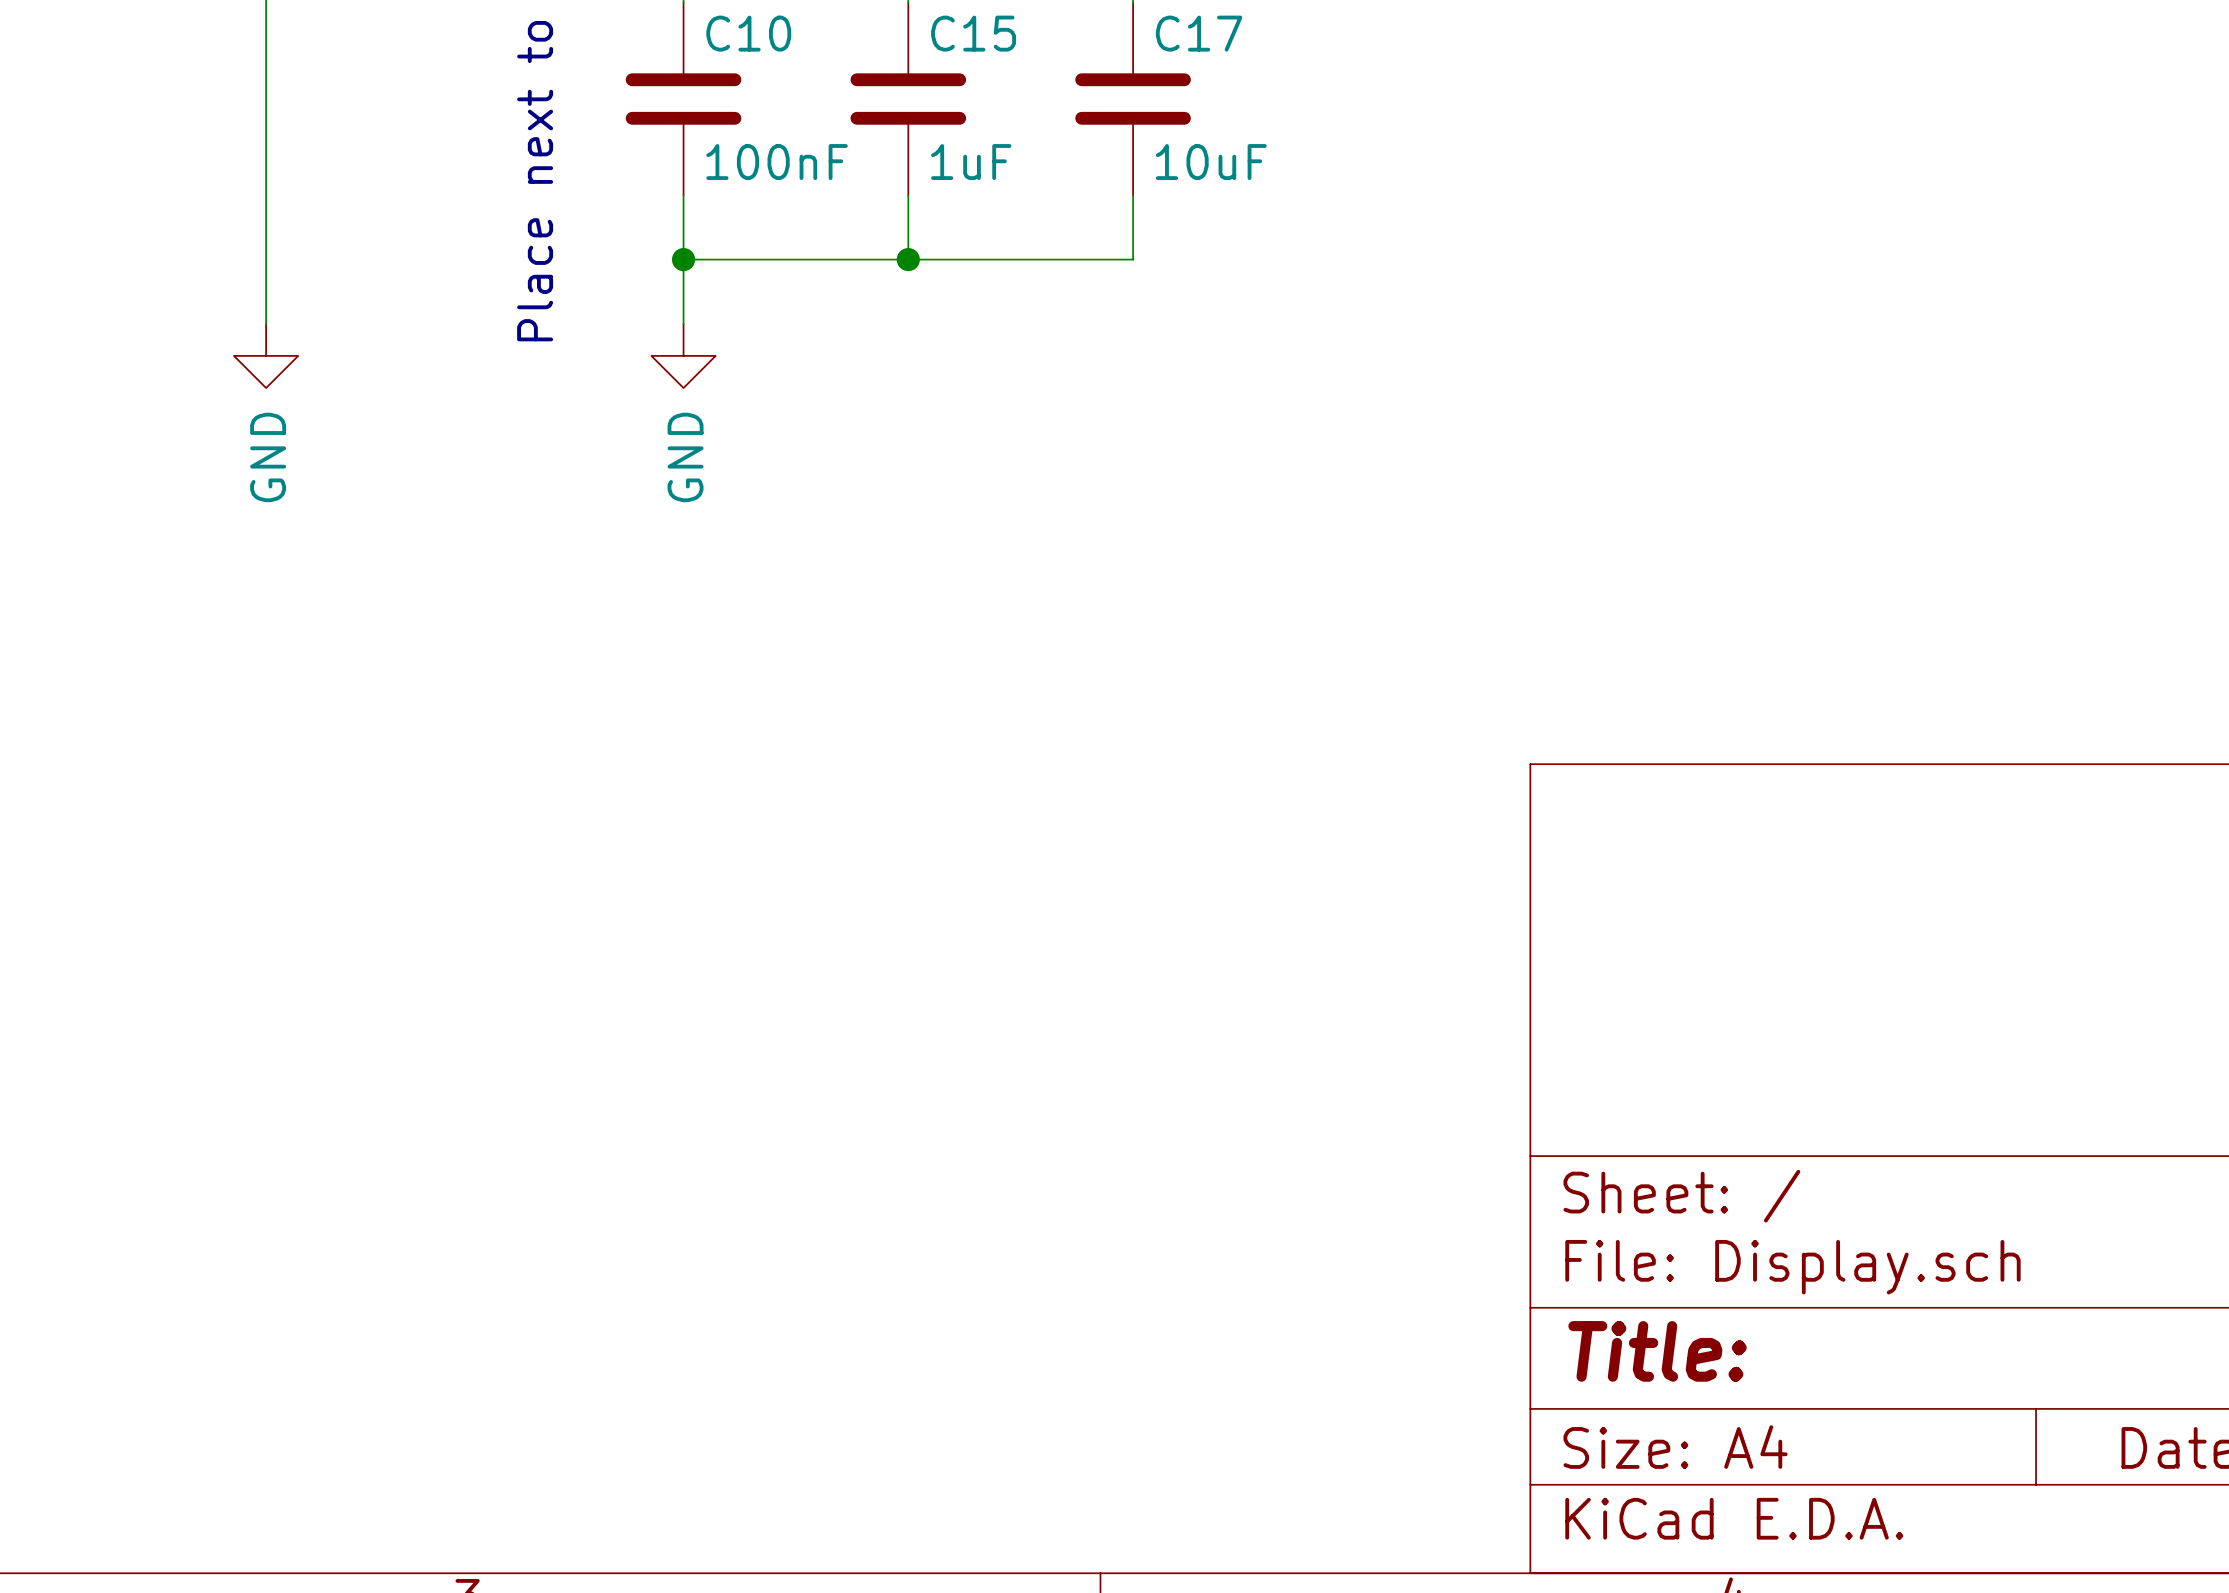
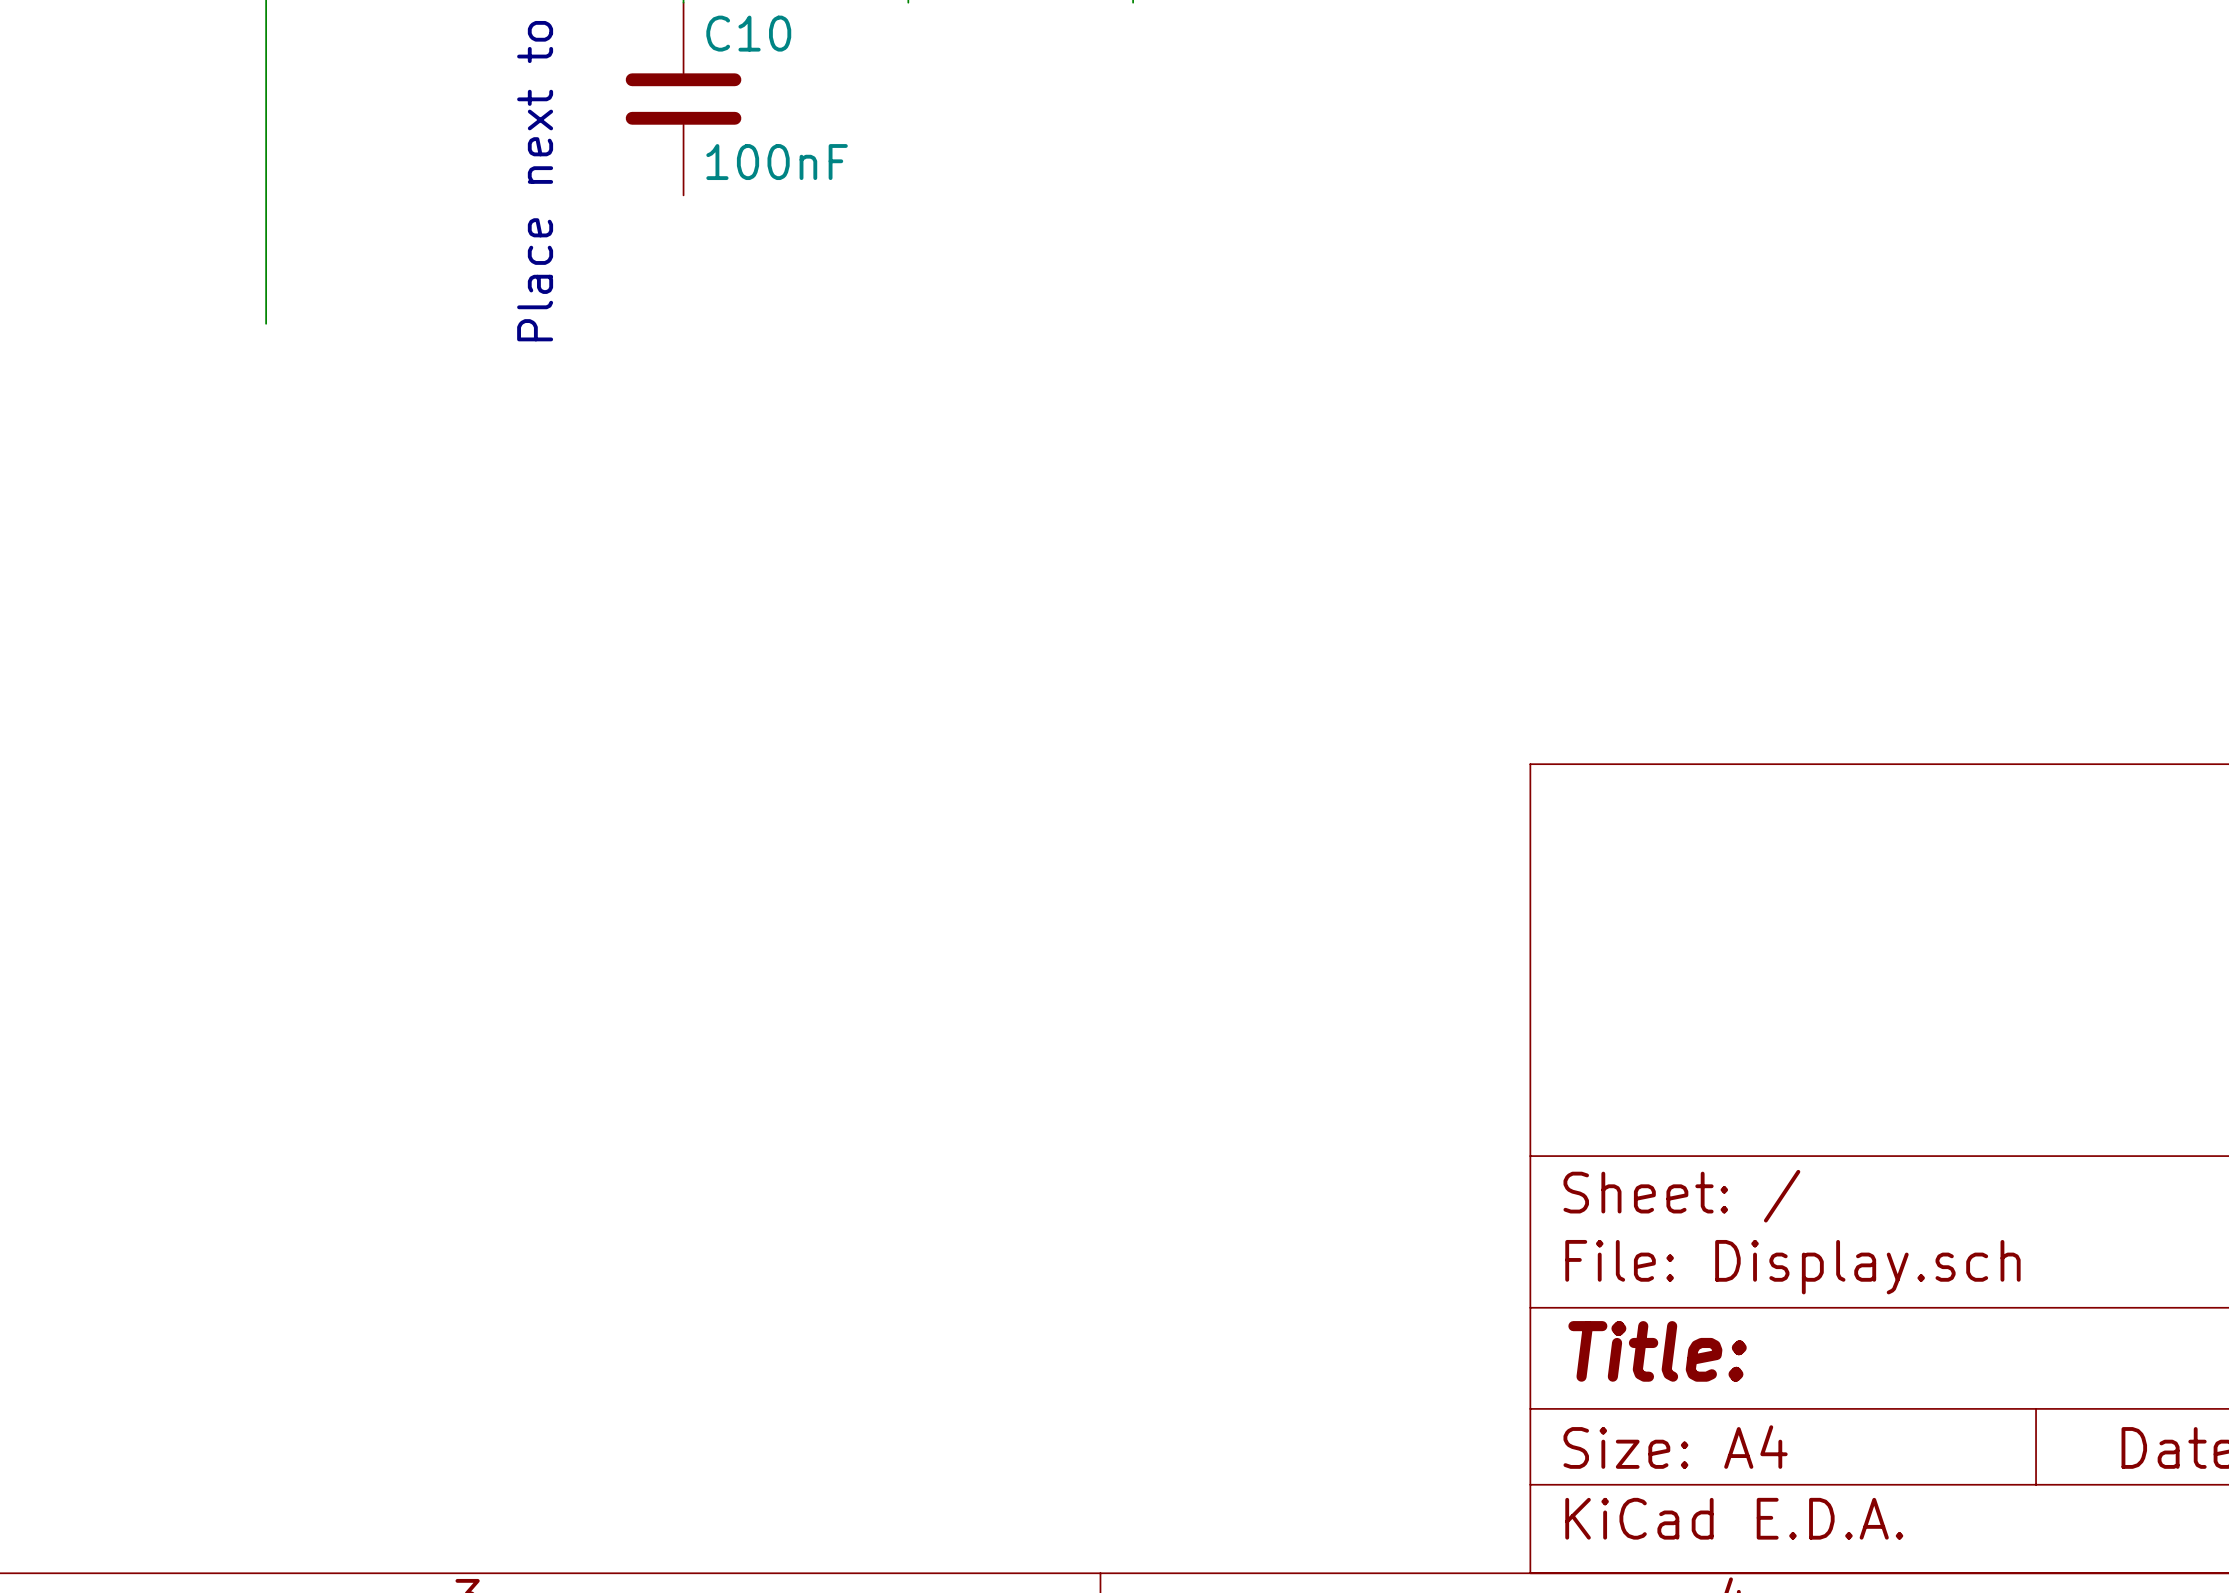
C15: 1uF (908, 99) -> none
C17: 10uF (1133, 99) -> none
wire: (683, 195) (683, 323) -> none
wire: (908, 195) (908, 259) -> none
wire: (1133, 195) (1133, 259) (683, 259) -> none
junction: (683, 259) -> none
junction: (908, 259) -> none
power symbol: GND (266, 355) -> none
power symbol: GND (683, 355) -> none

